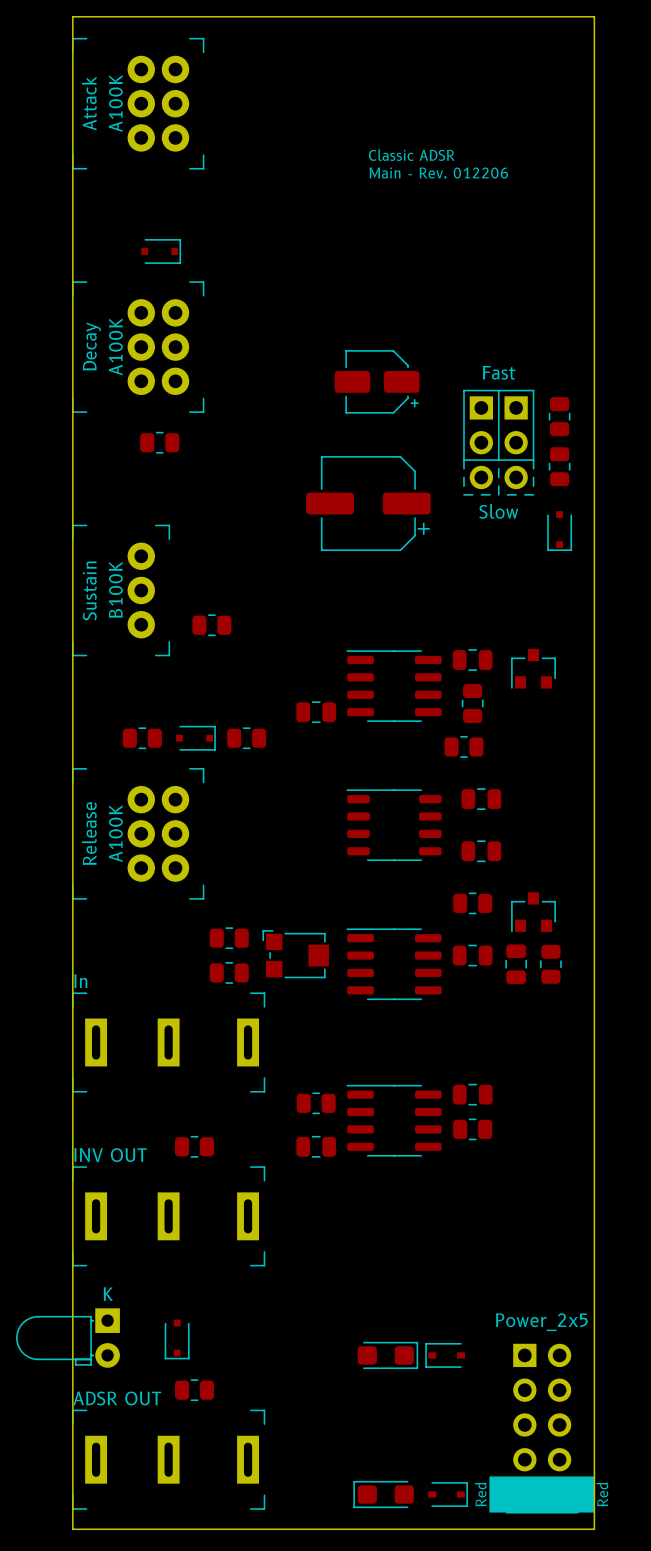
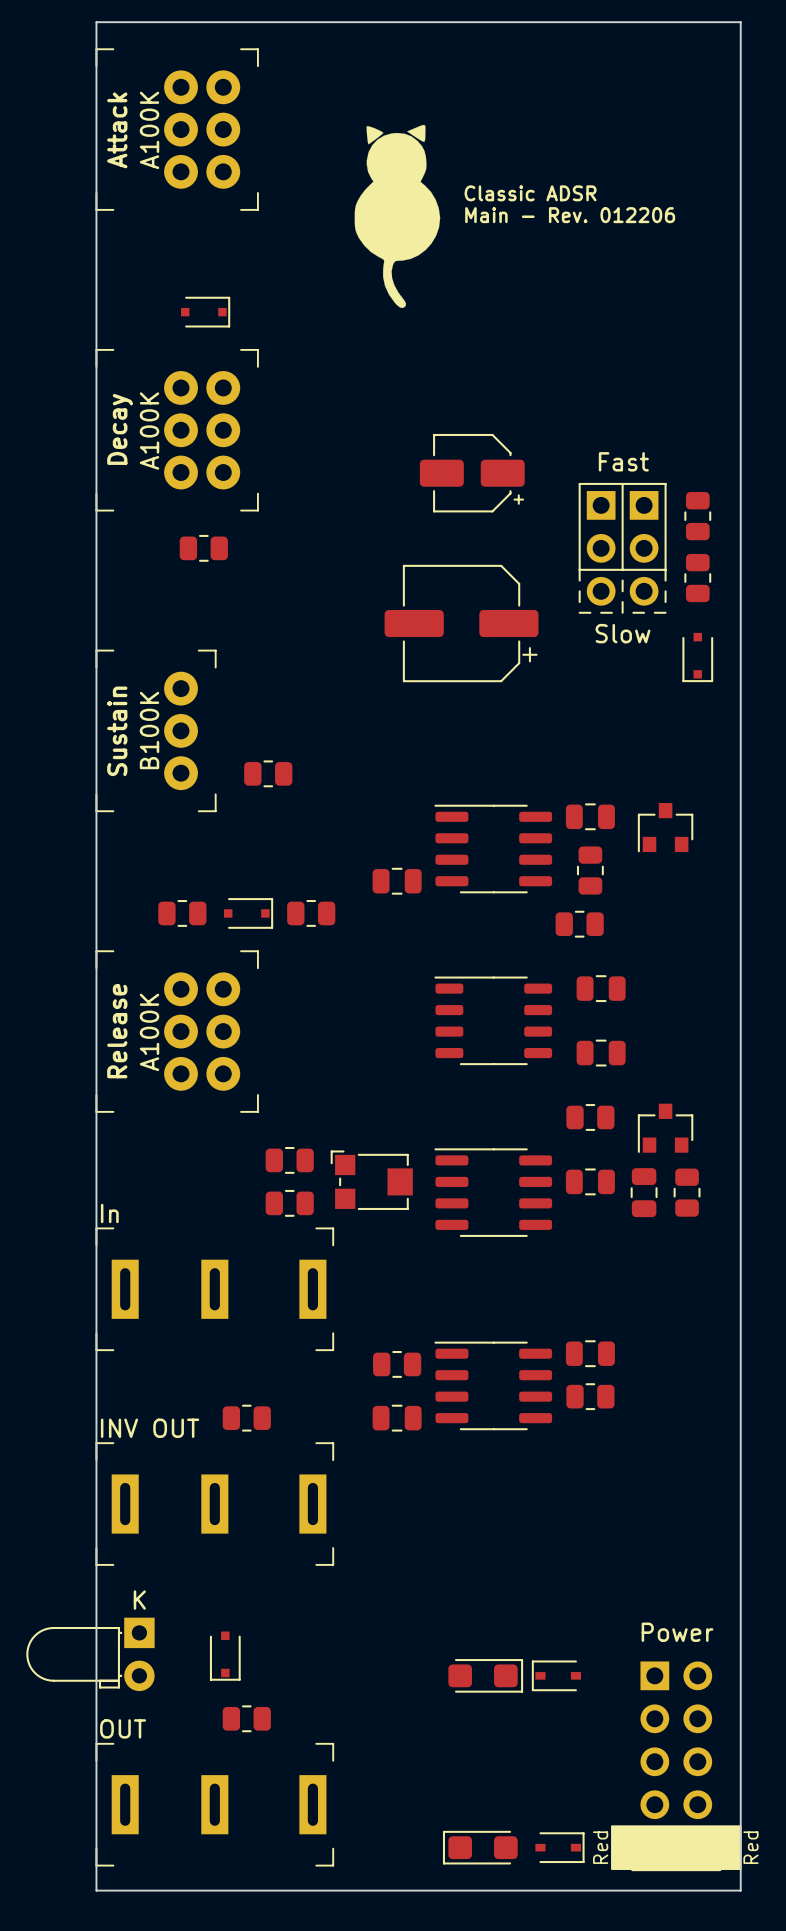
drawing: none -> [354, 124, 441, 309]
part value: Power_2x5 (541, 1322) -> Power (677, 1632)
part value: ADSR OUT (117, 1398) -> OUT (123, 1728)

